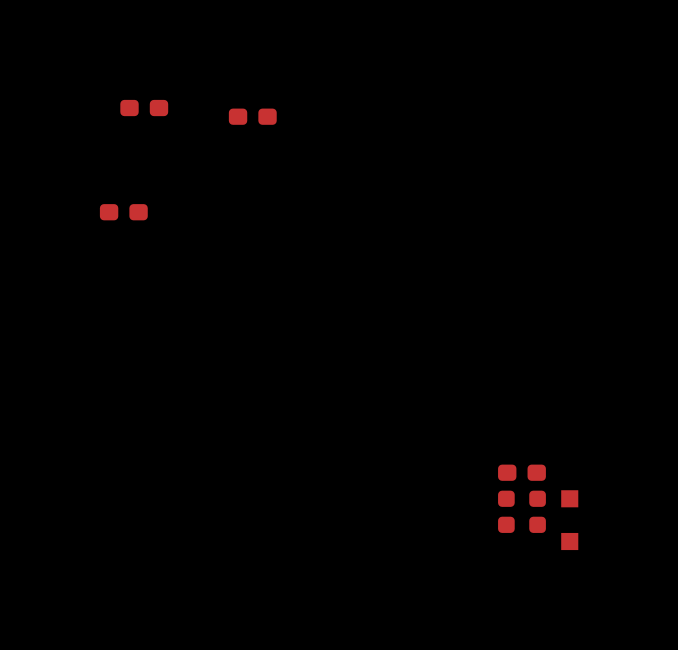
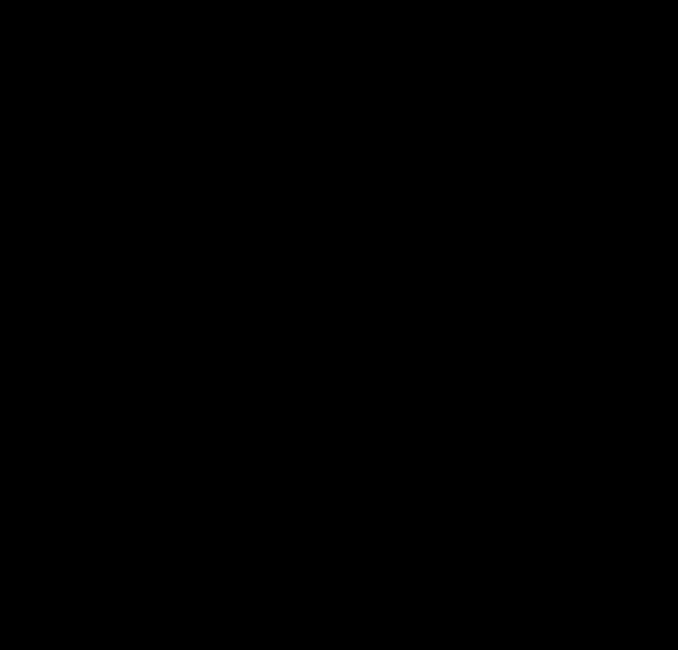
part: (144, 108) -> none
part: (252, 116) -> none
part: (123, 212) -> none
part: (521, 472) -> none
part: (521, 498) -> none
part: (569, 520) -> none
part: (521, 524) -> none

